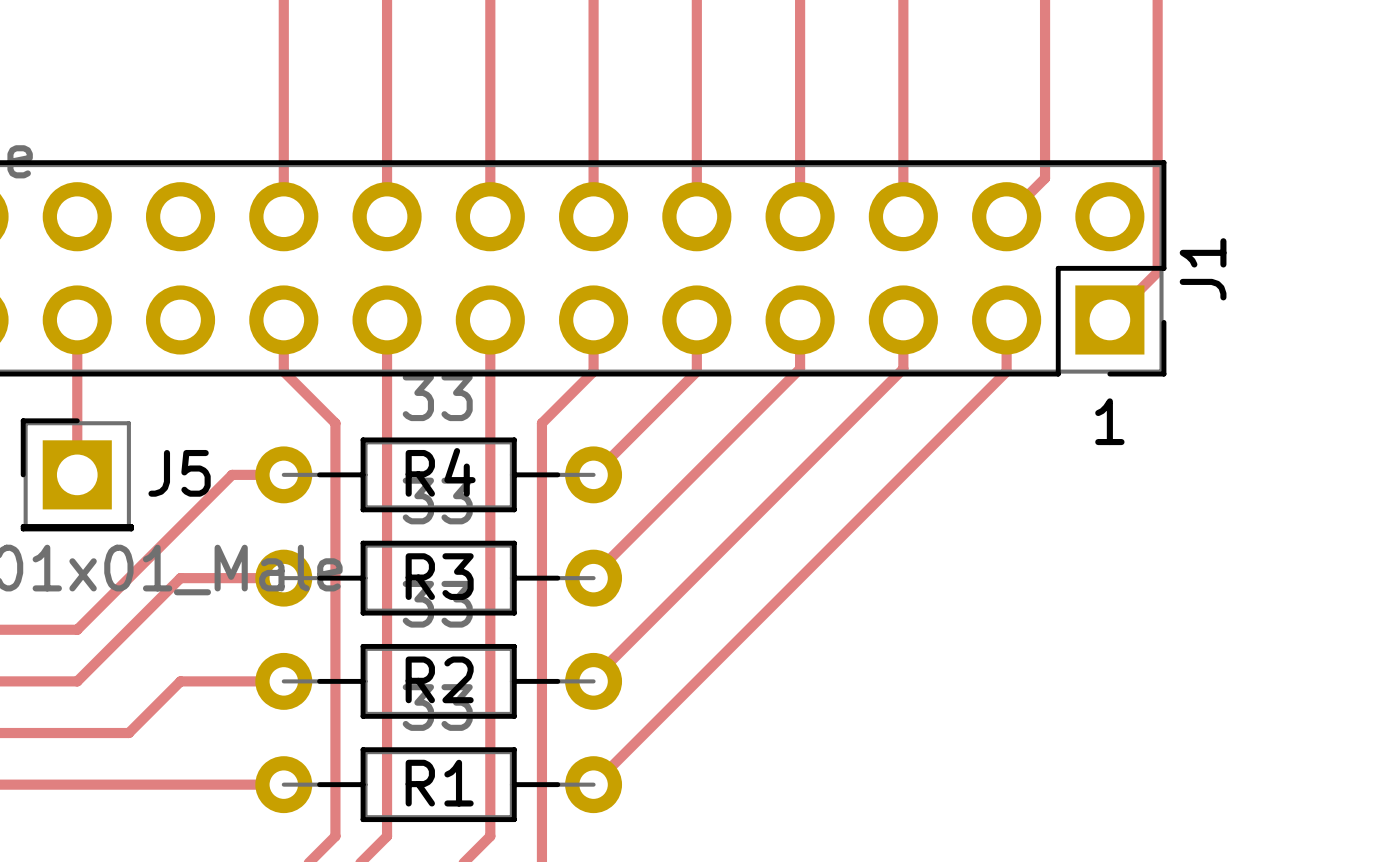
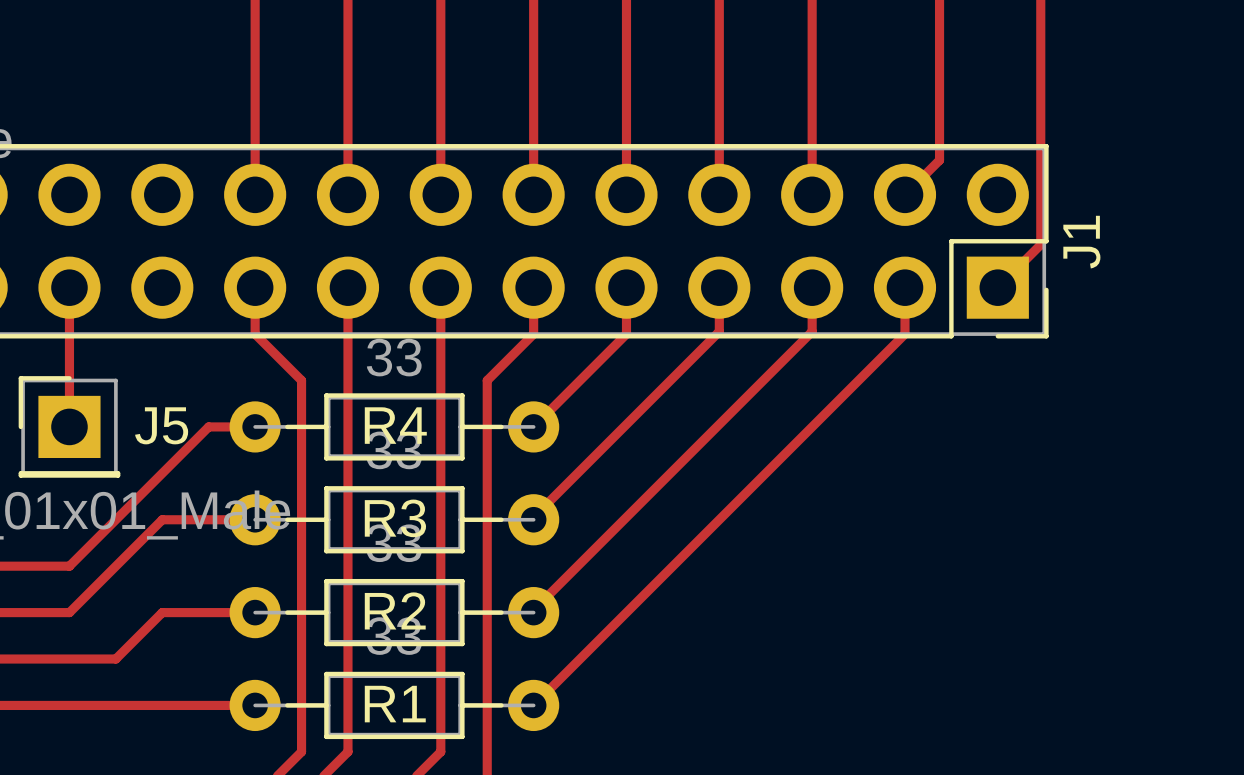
text: 1 (1109, 421) -> none

